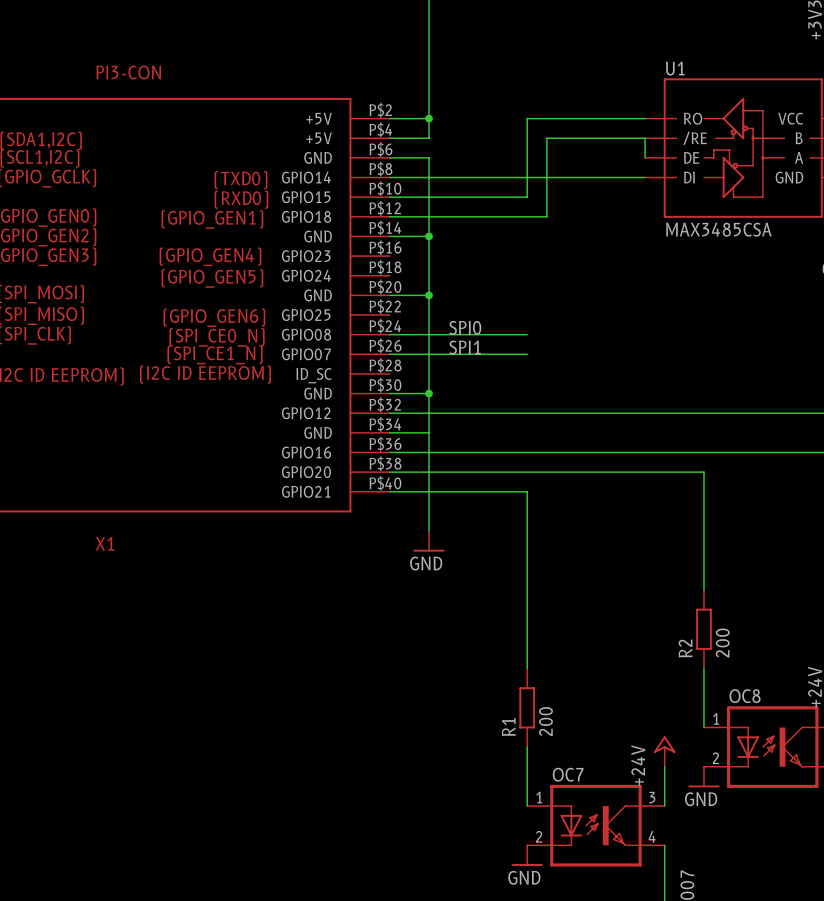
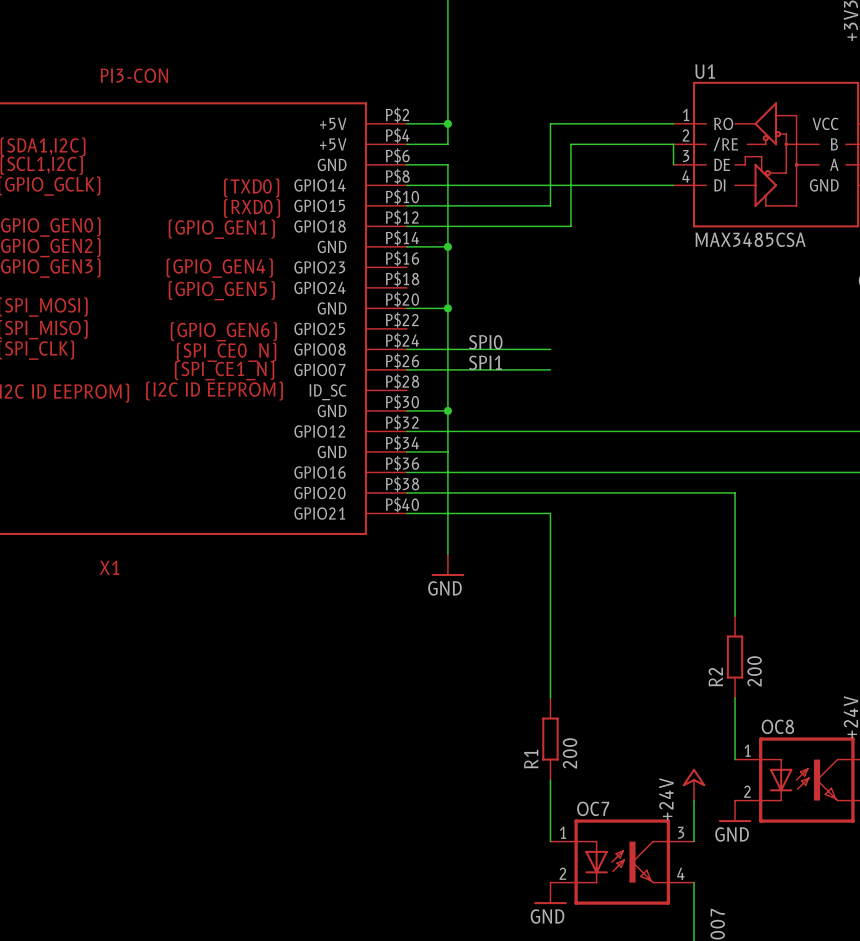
U1 pin number: none -> 1 (686, 114)
U1 pin number: none -> 2 (685, 135)
U1 pin number: none -> 3 (686, 156)
U1 pin number: none -> 4 (685, 176)

